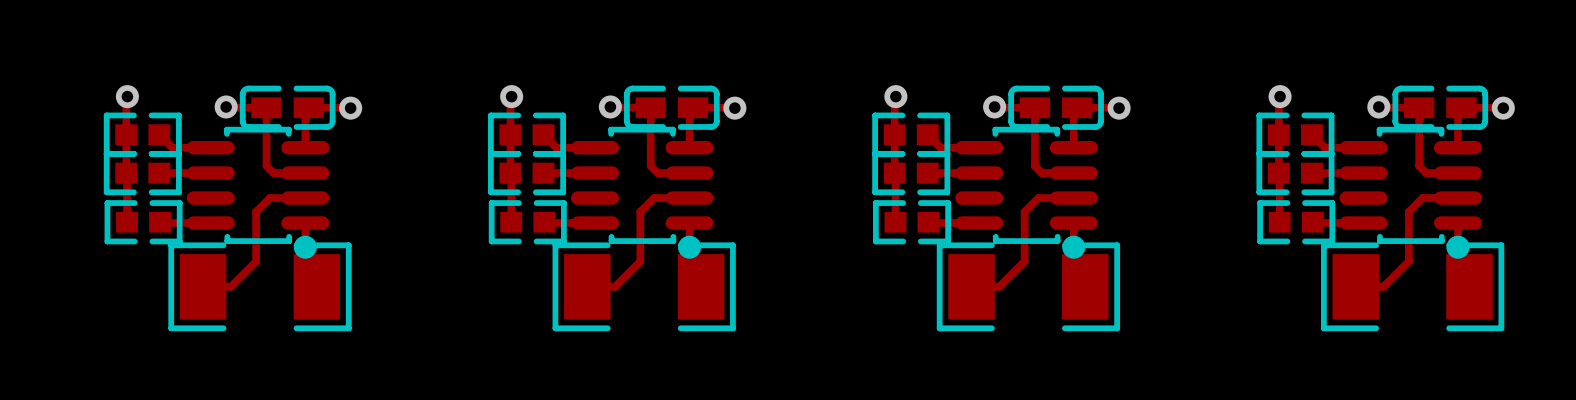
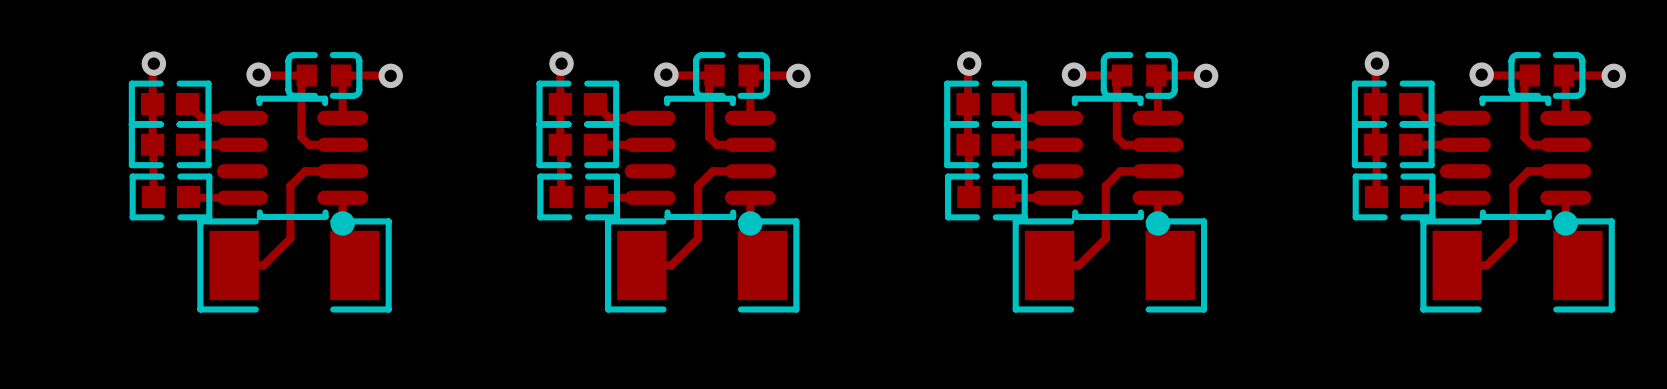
part footprint: [239, 85, 336, 130] -> [285, 52, 363, 99]
part footprint: [624, 85, 720, 130] -> [693, 52, 771, 99]
part footprint: [1008, 85, 1104, 130] -> [1100, 52, 1178, 99]
part footprint: [1392, 85, 1489, 130] -> [1508, 52, 1586, 99]

